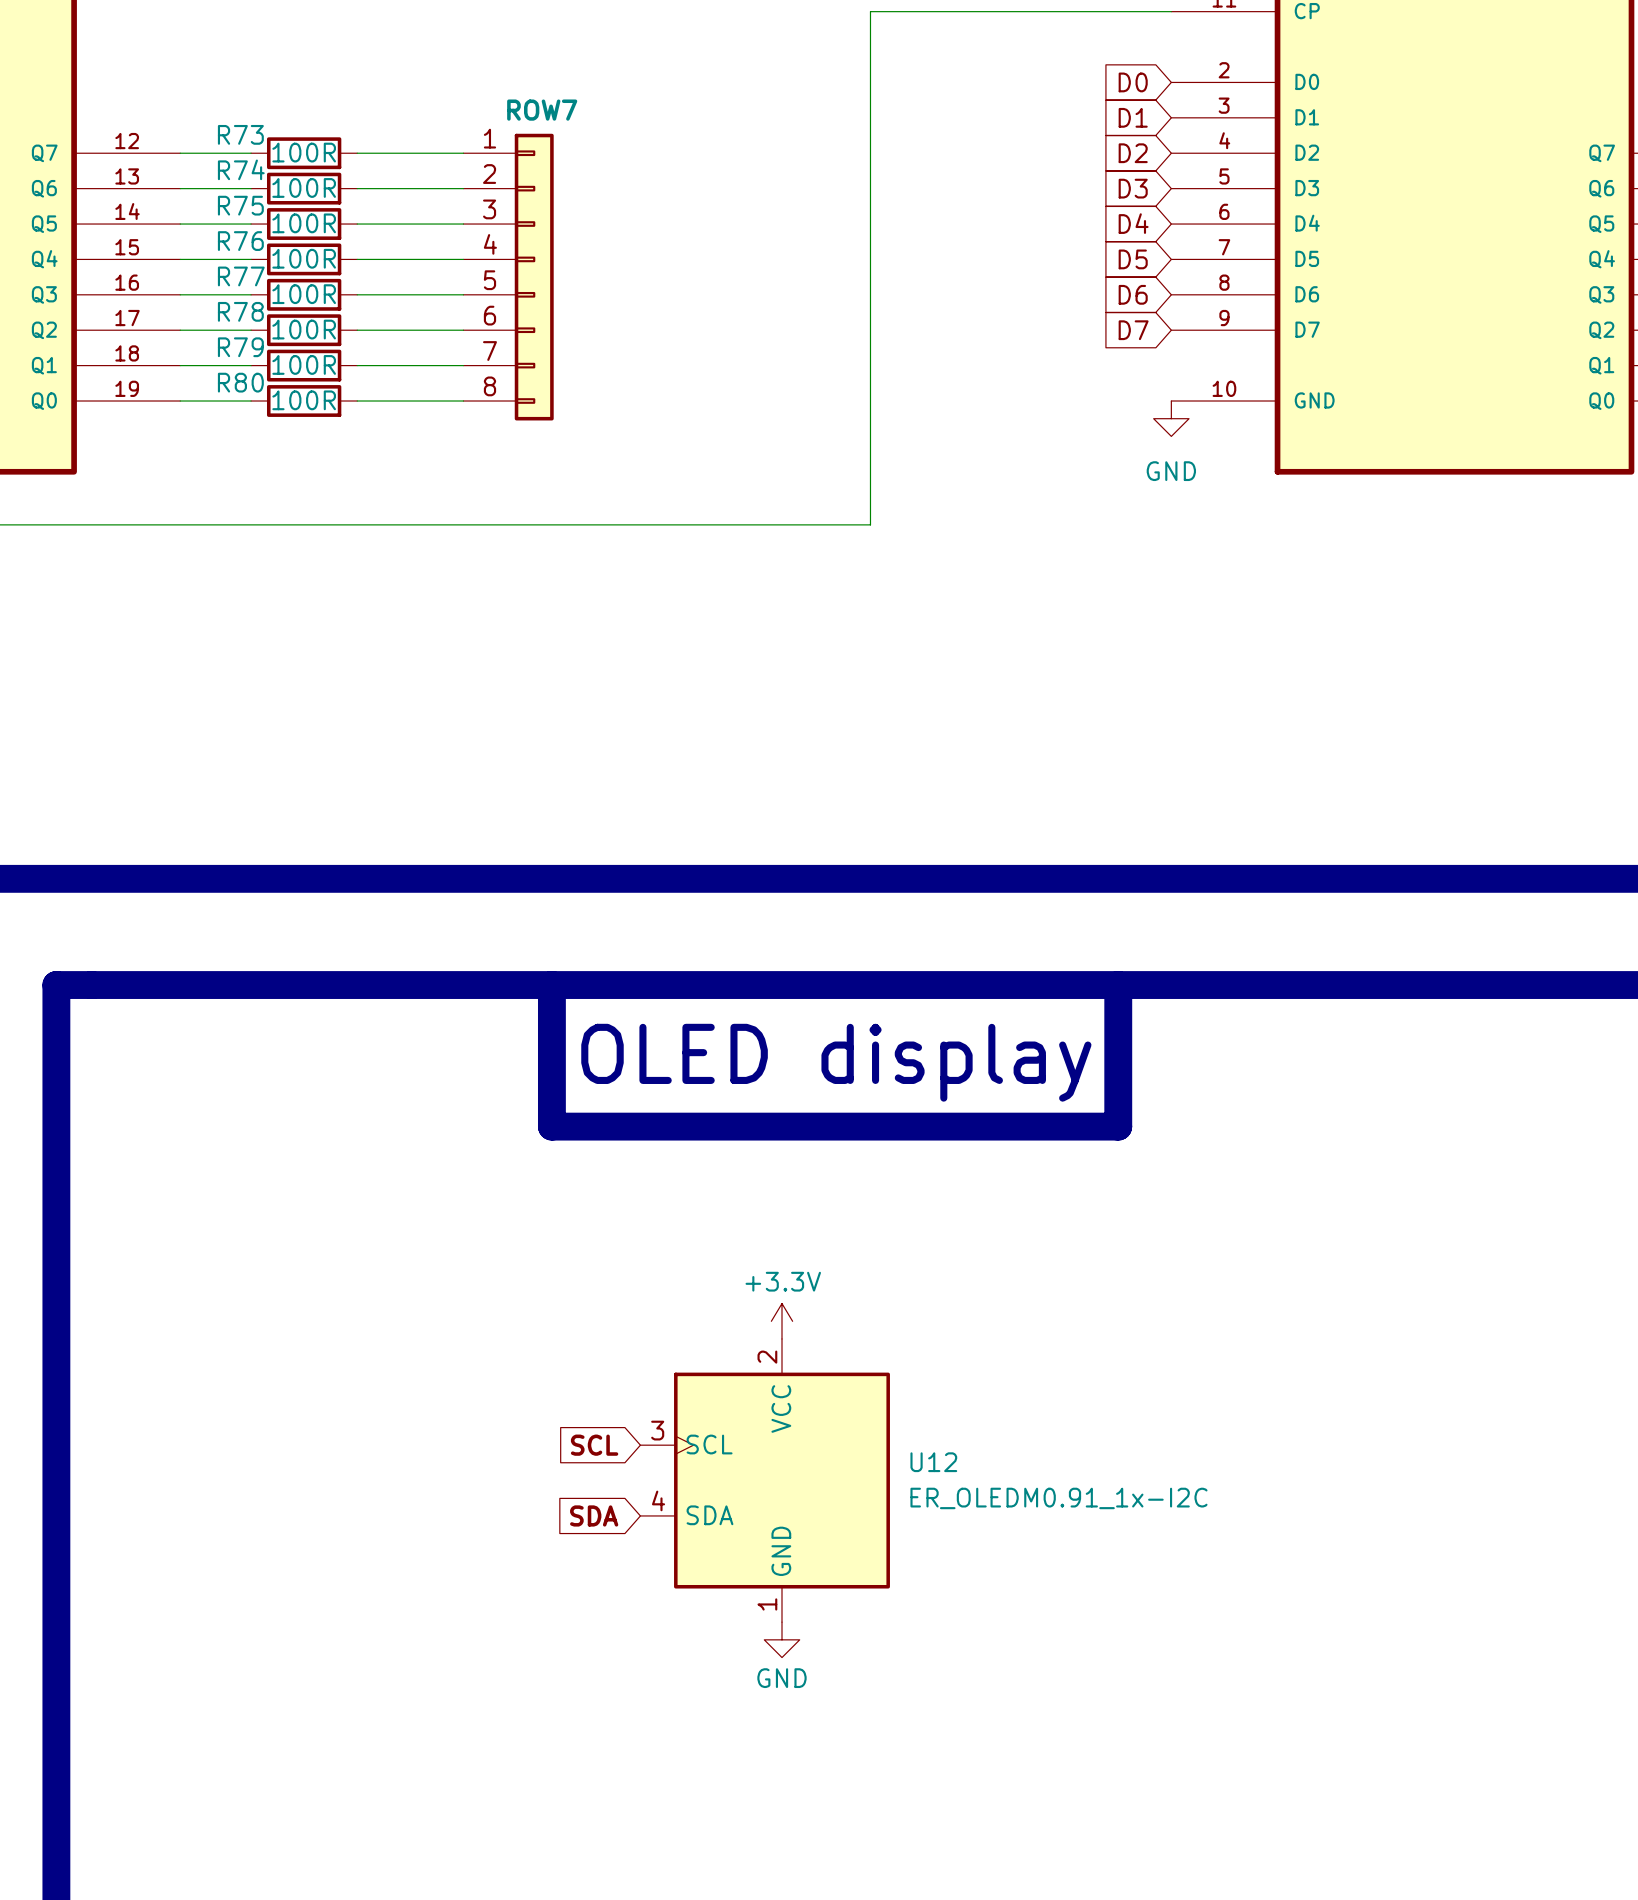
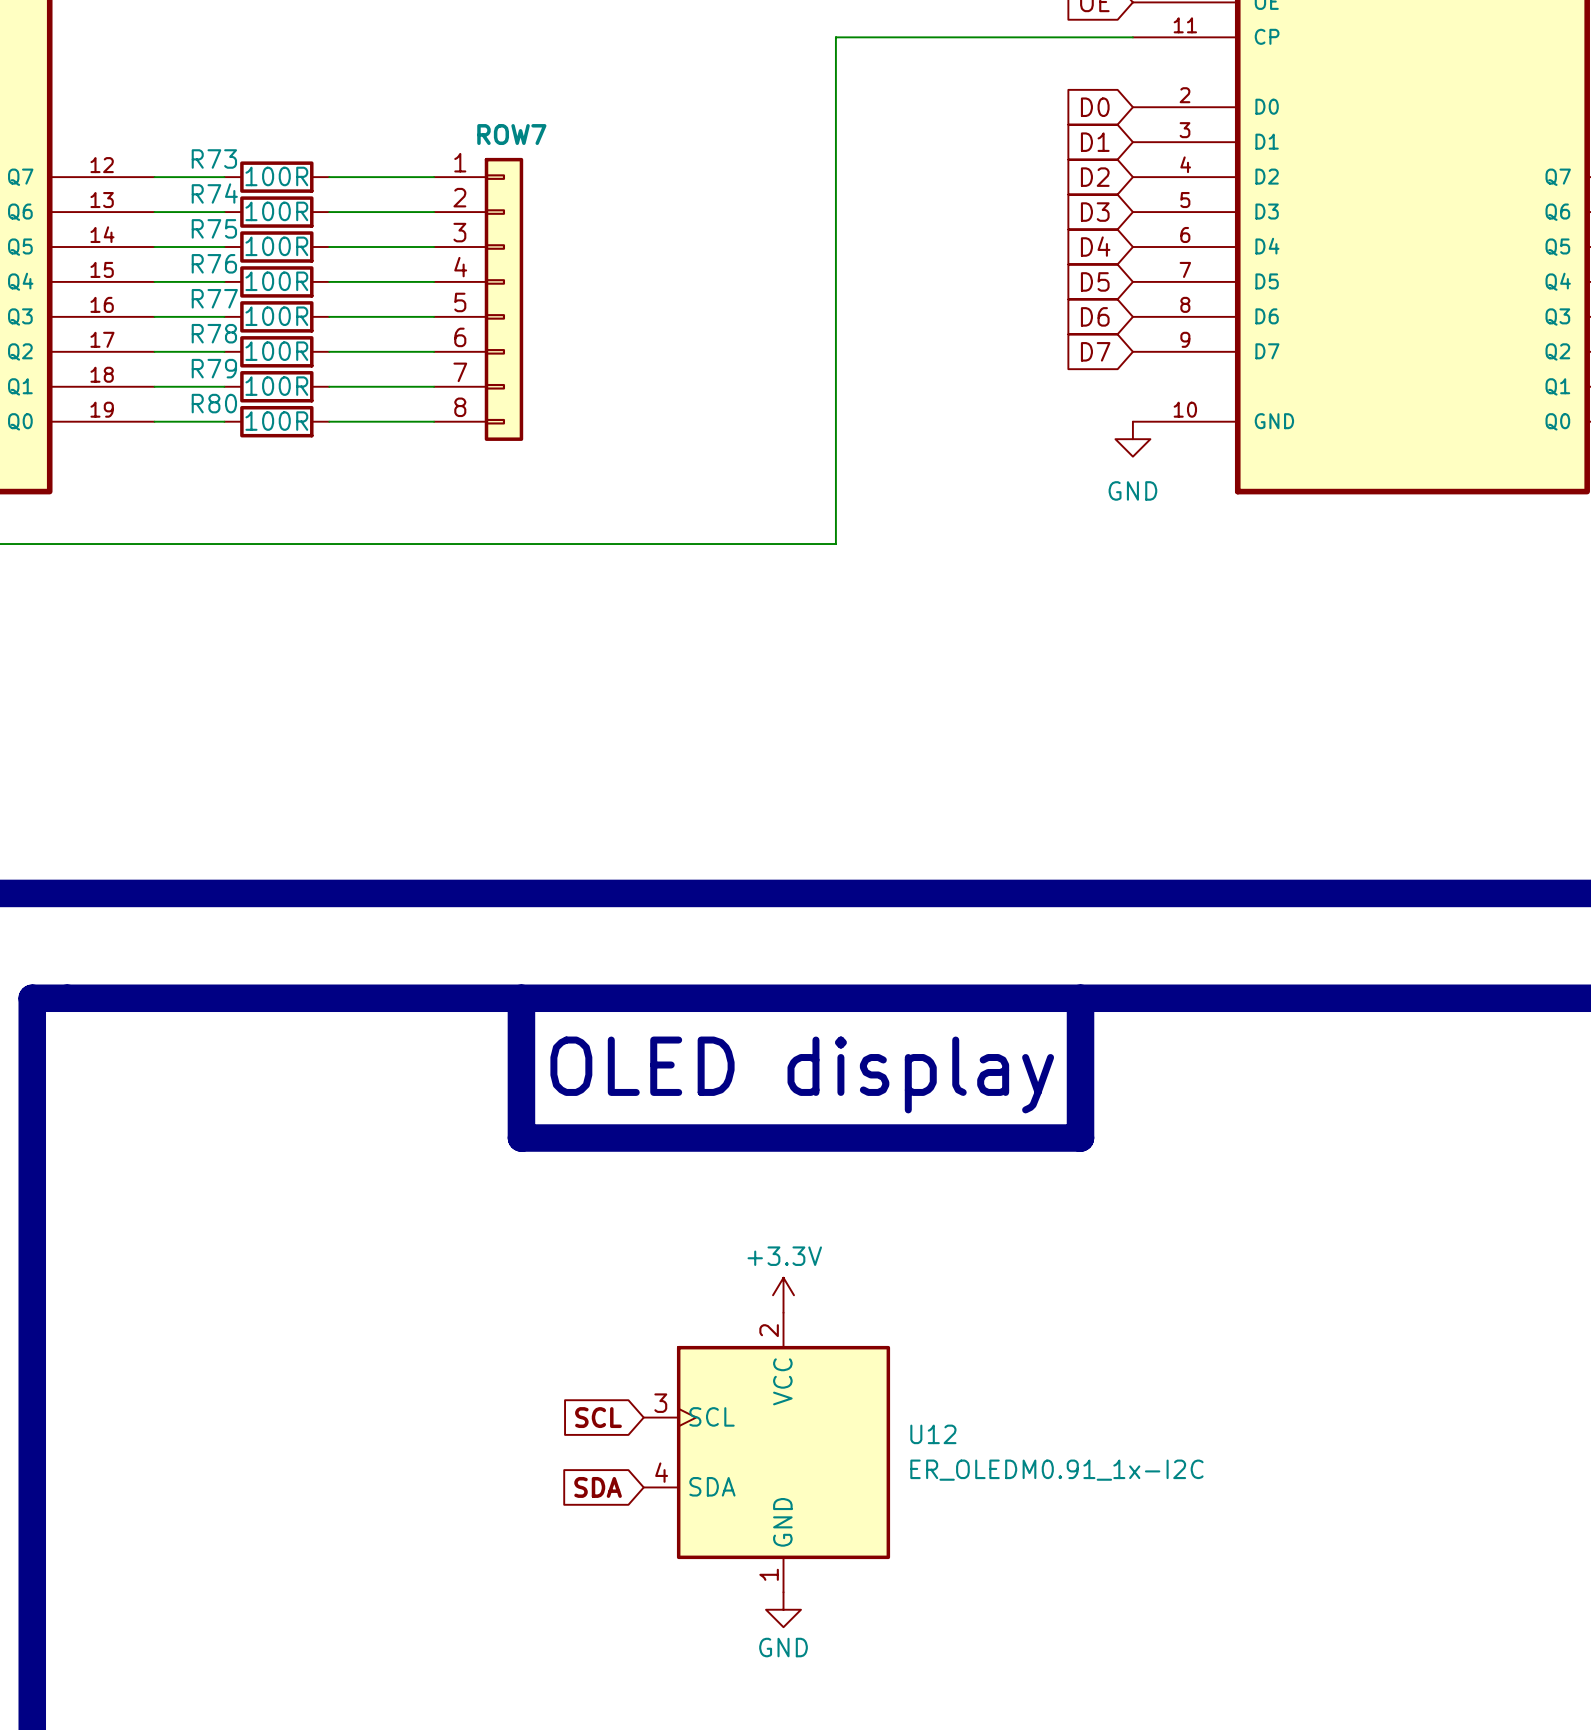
power symbol position: +3.3V (782, 1321) -> +3.3V (783, 1295)
global label position: SCL (594, 1445) -> SCL (598, 1417)
U12 position: (765, 1480) -> (766, 1452)
global label position: SDA (594, 1515) -> SDA (598, 1487)
power symbol position: GND (782, 1639) -> GND (783, 1609)

